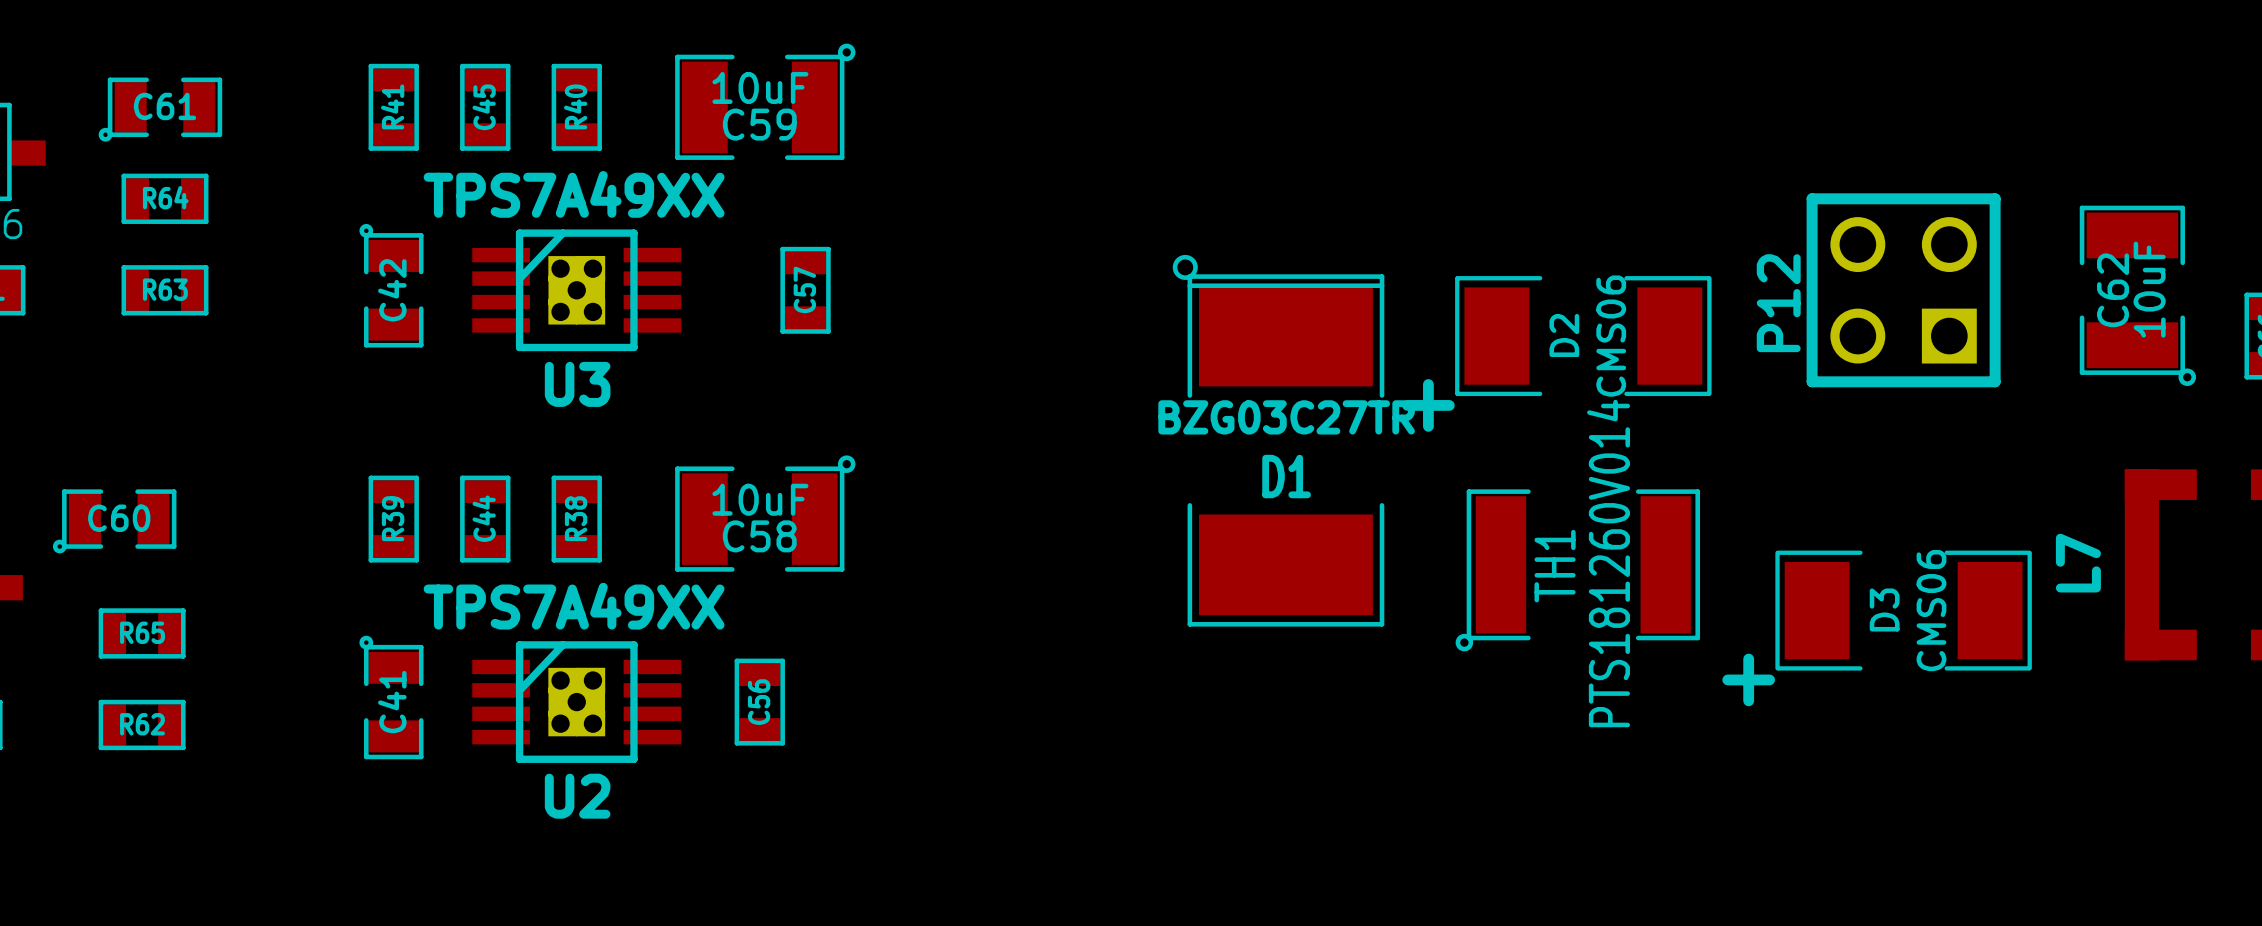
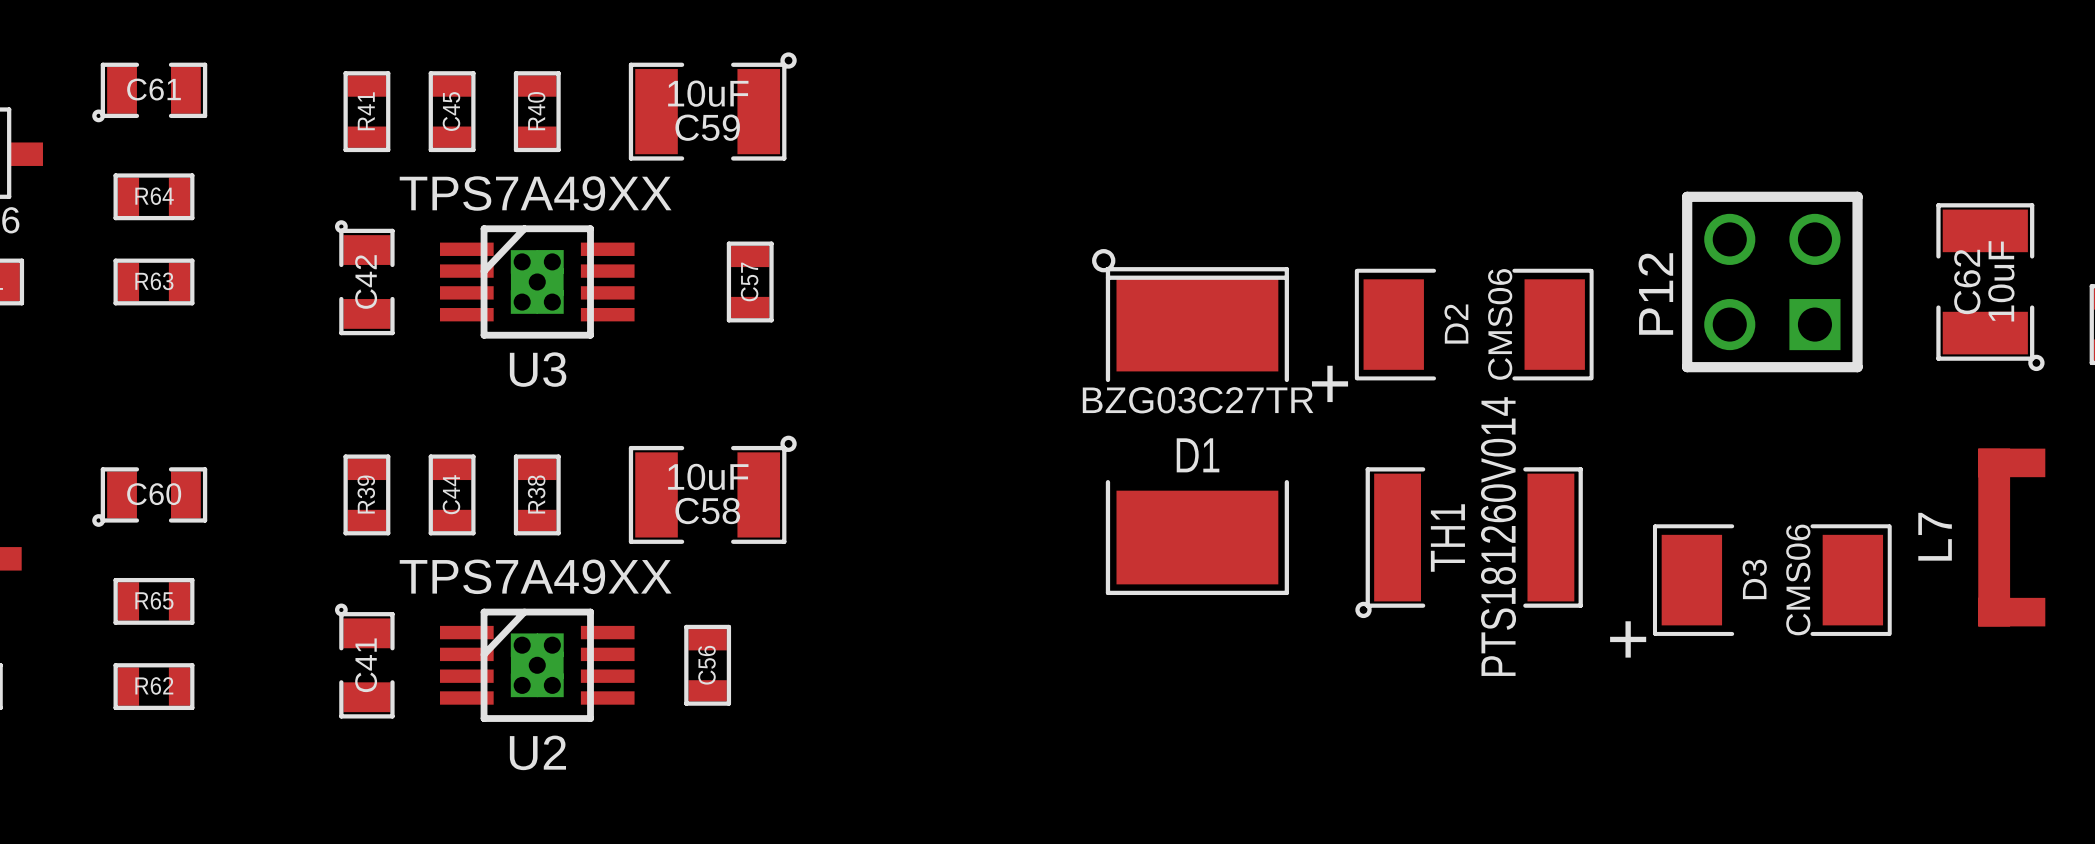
C61 position: (160, 109) -> (149, 92)
C60 position: (114, 521) -> (149, 497)
R65 position: (142, 633) -> (153, 601)
R62 position: (142, 724) -> (153, 686)

